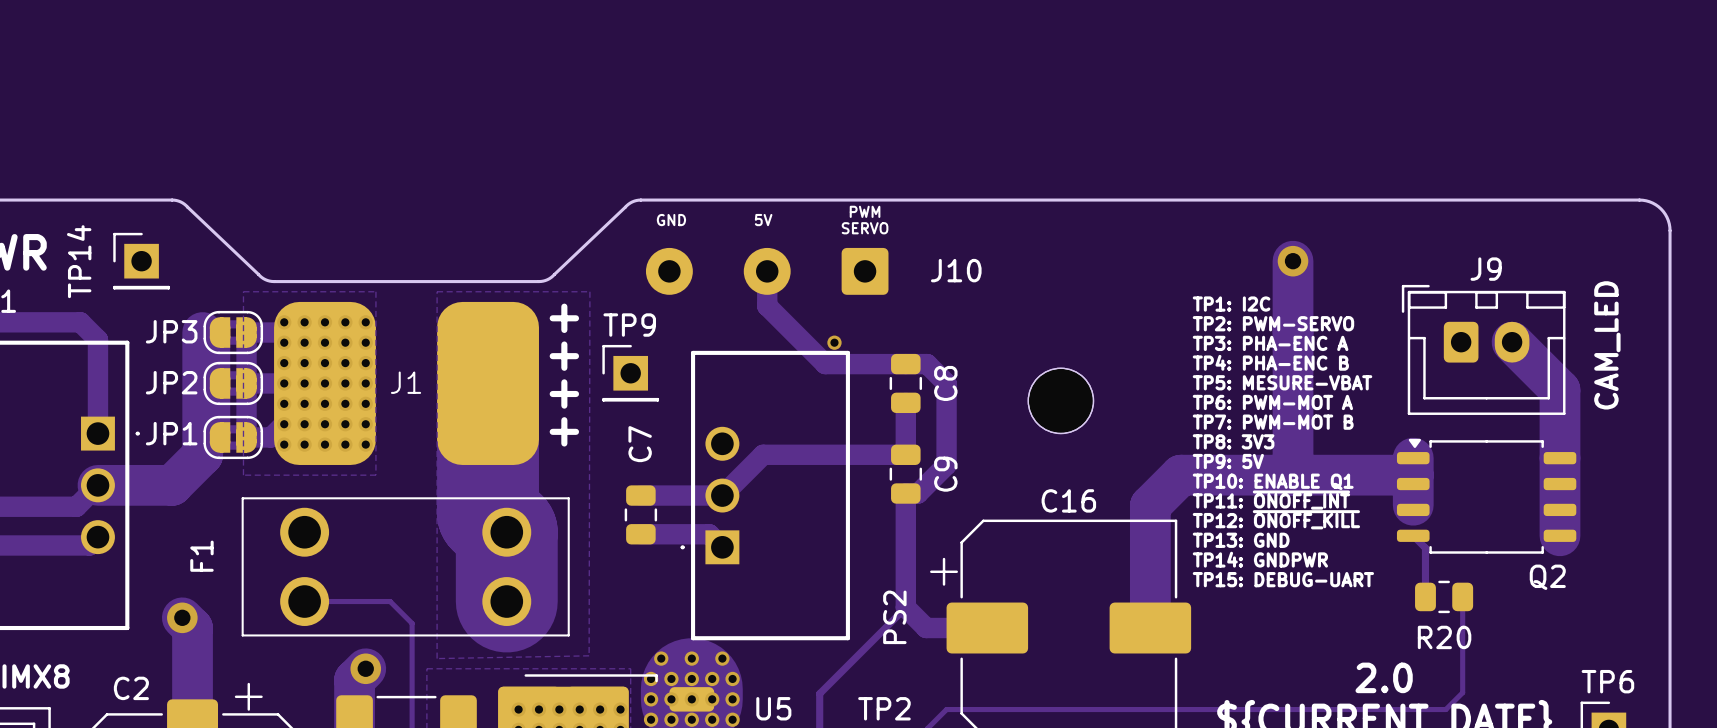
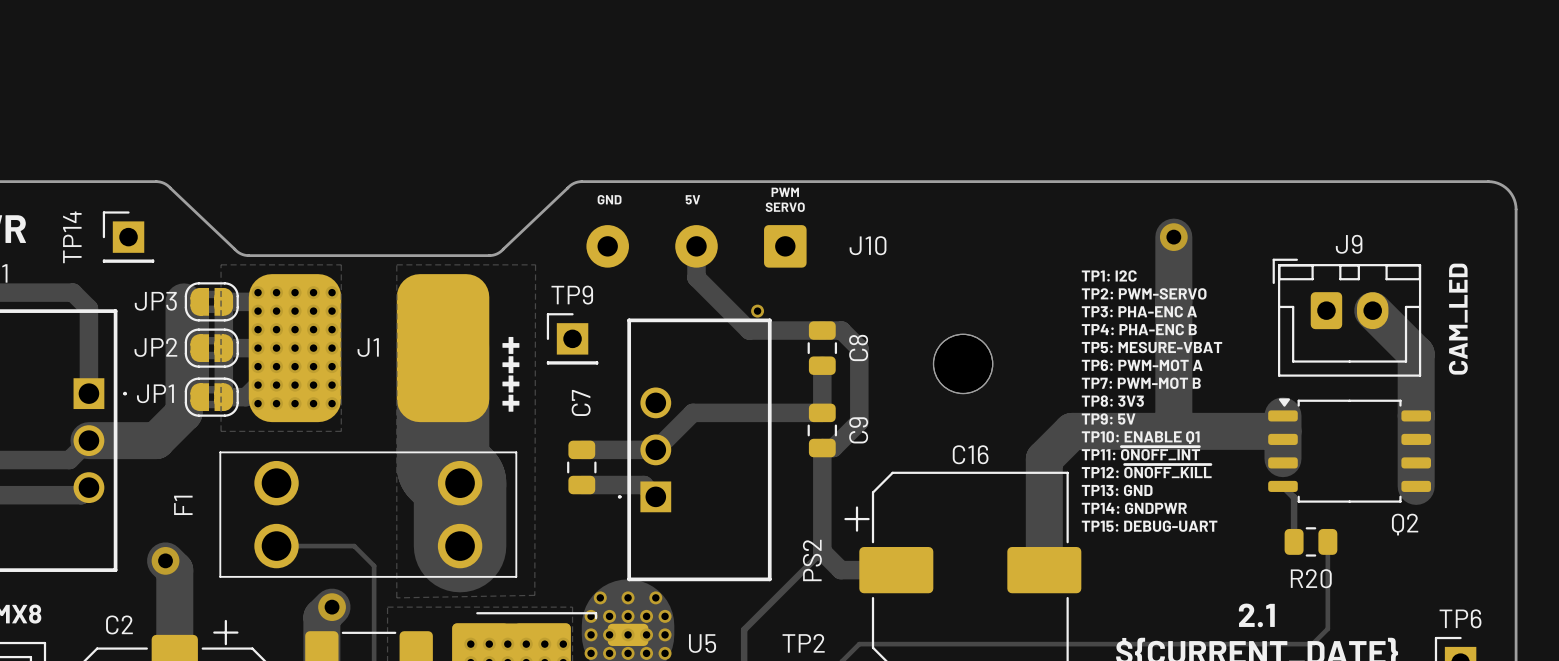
text: 2.0 (1384, 677) -> 2.1 (1256, 615)

